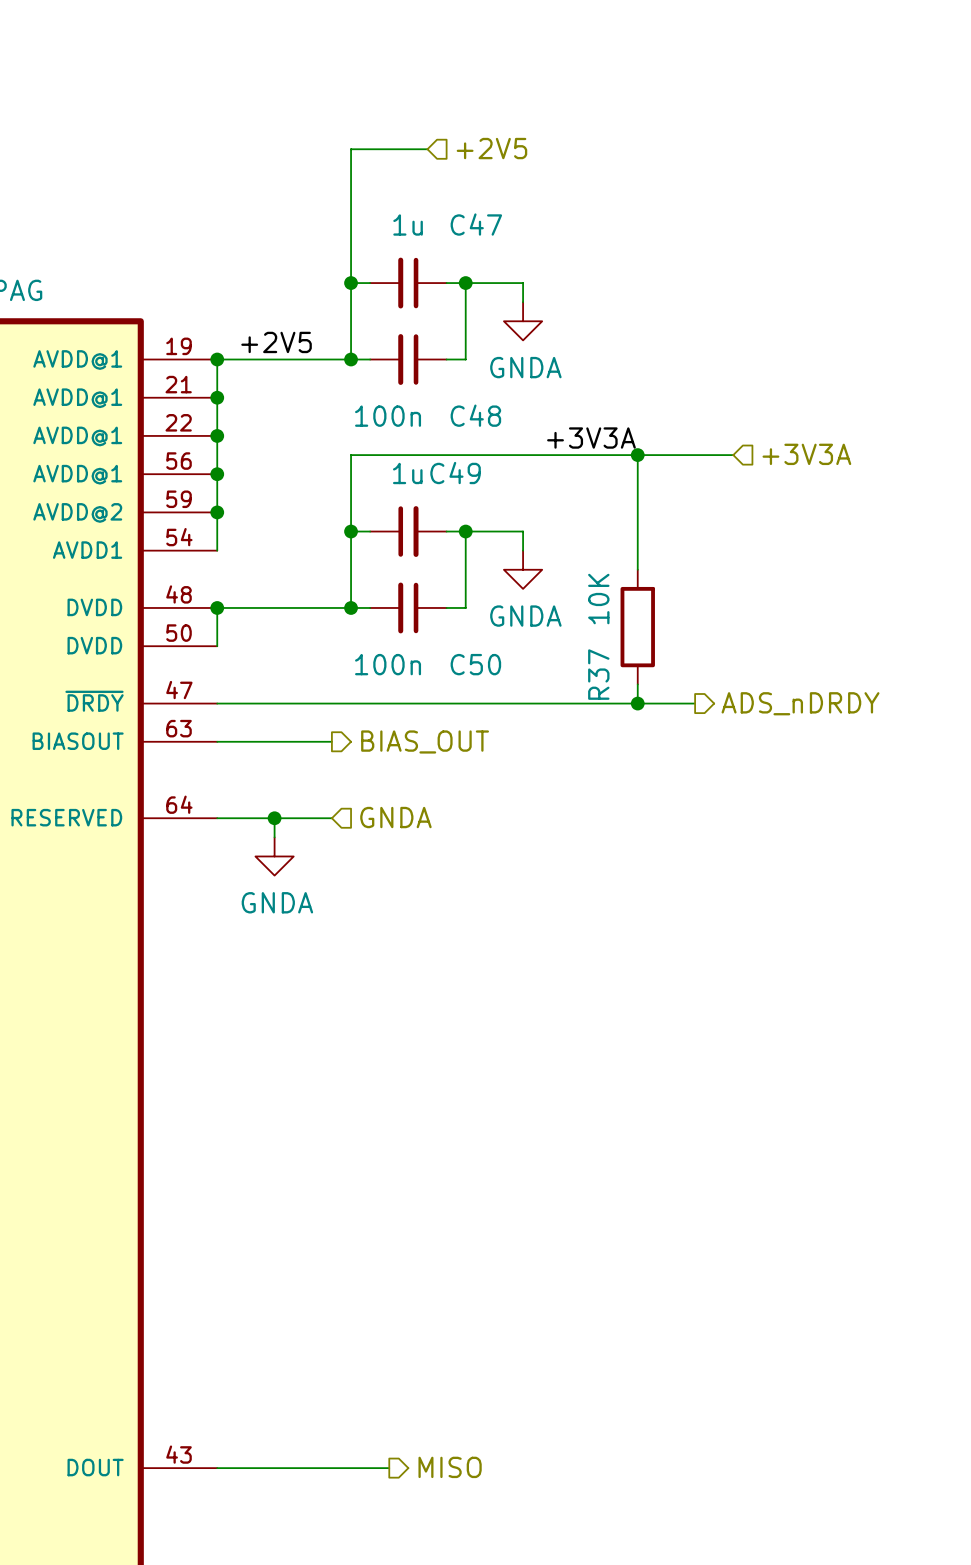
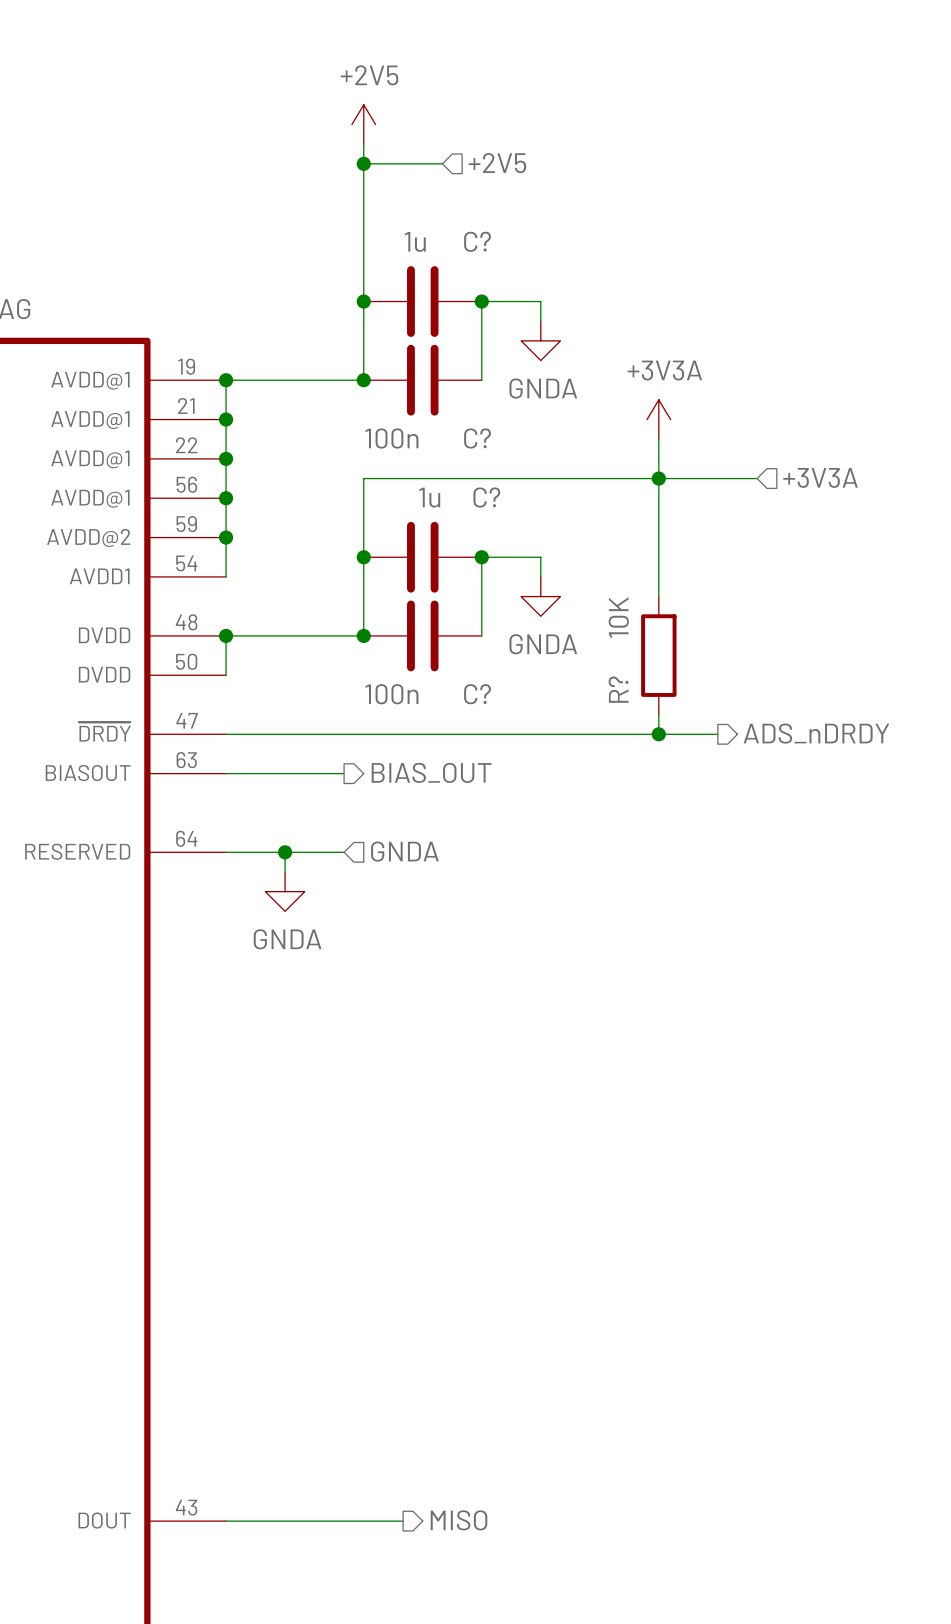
power symbol: none -> +2V5 (363, 124)
wire: none -> (363, 144) (363, 163)
junction: none -> (363, 163)
C47: 1u (408, 283) -> none
C?: none -> 1u (422, 301)
label: +2V5 (276, 342) -> none
C48: 100n (408, 359) -> none
C?: none -> 100n (422, 380)
power symbol: none -> +3V3A (658, 419)
wire: none -> (658, 439) (658, 478)
label: +3V3A (591, 438) -> none
C49: 1u (408, 531) -> none
C?: none -> 1u (422, 557)
C50: 100n (408, 607) -> none
C?: none -> 100n (422, 635)
R37 name: R37 (598, 674) -> R? (618, 689)

